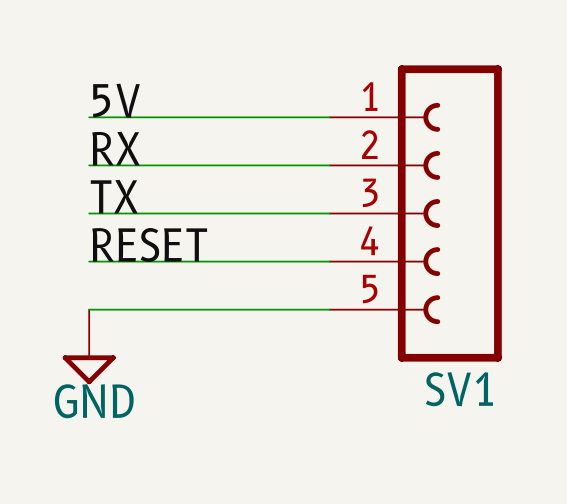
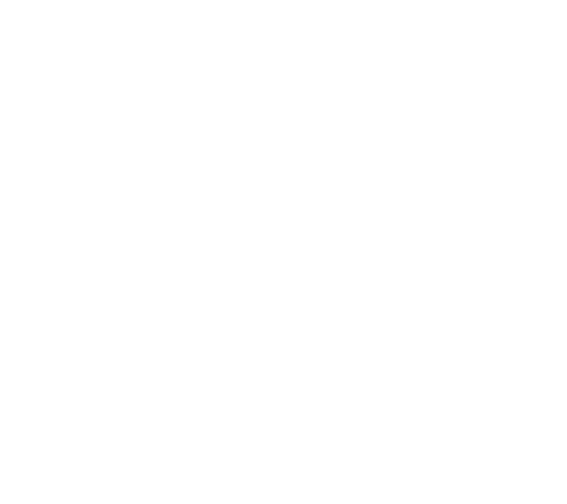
label: 5V (116, 100) -> none
wire: (89, 117) (329, 117) -> none
label: RX (115, 148) -> none
wire: (89, 165) (329, 165) -> none
label: TX (114, 196) -> none
wire: (89, 213) (329, 213) -> none
SV1: (415, 213) -> none
label: RESET (149, 244) -> none
wire: (89, 261) (329, 261) -> none
wire: (89, 309) (329, 309) -> none
power symbol: GND (89, 346) -> none

